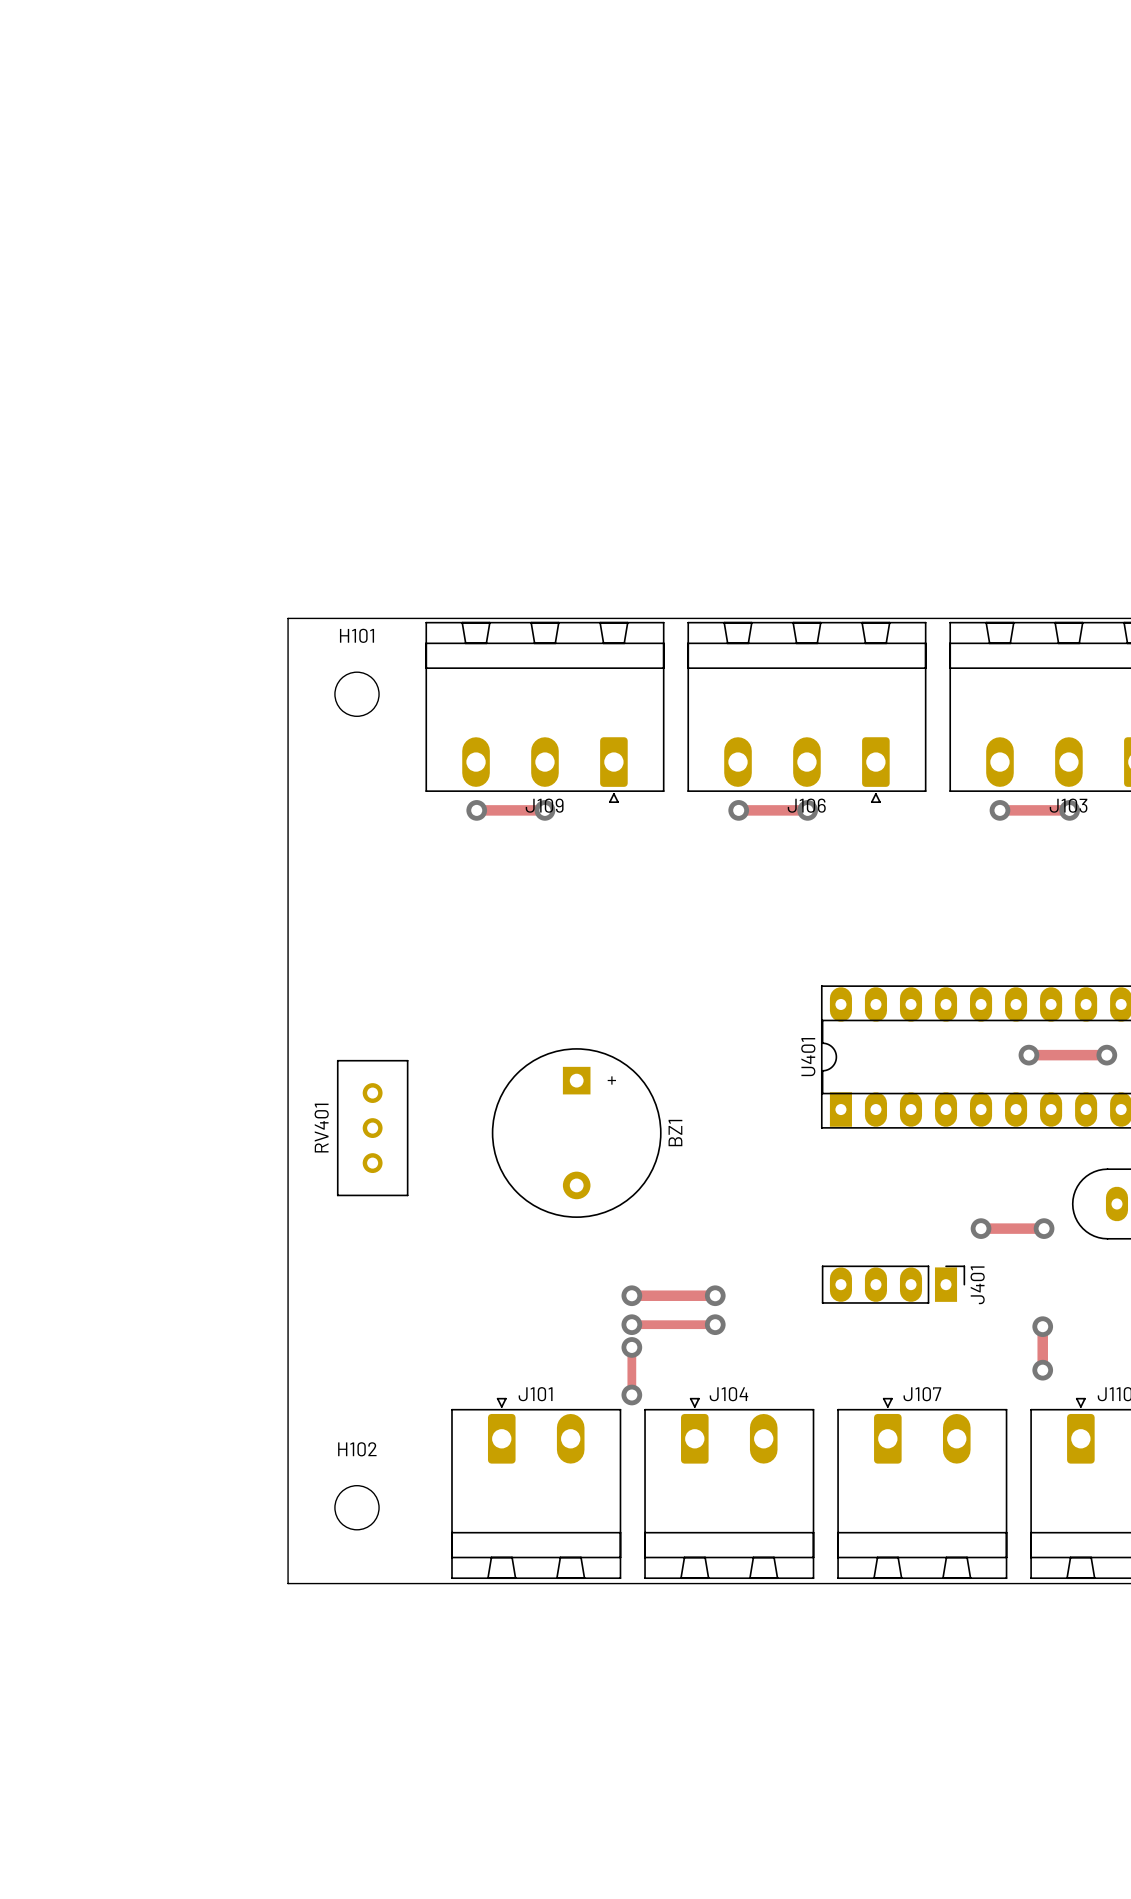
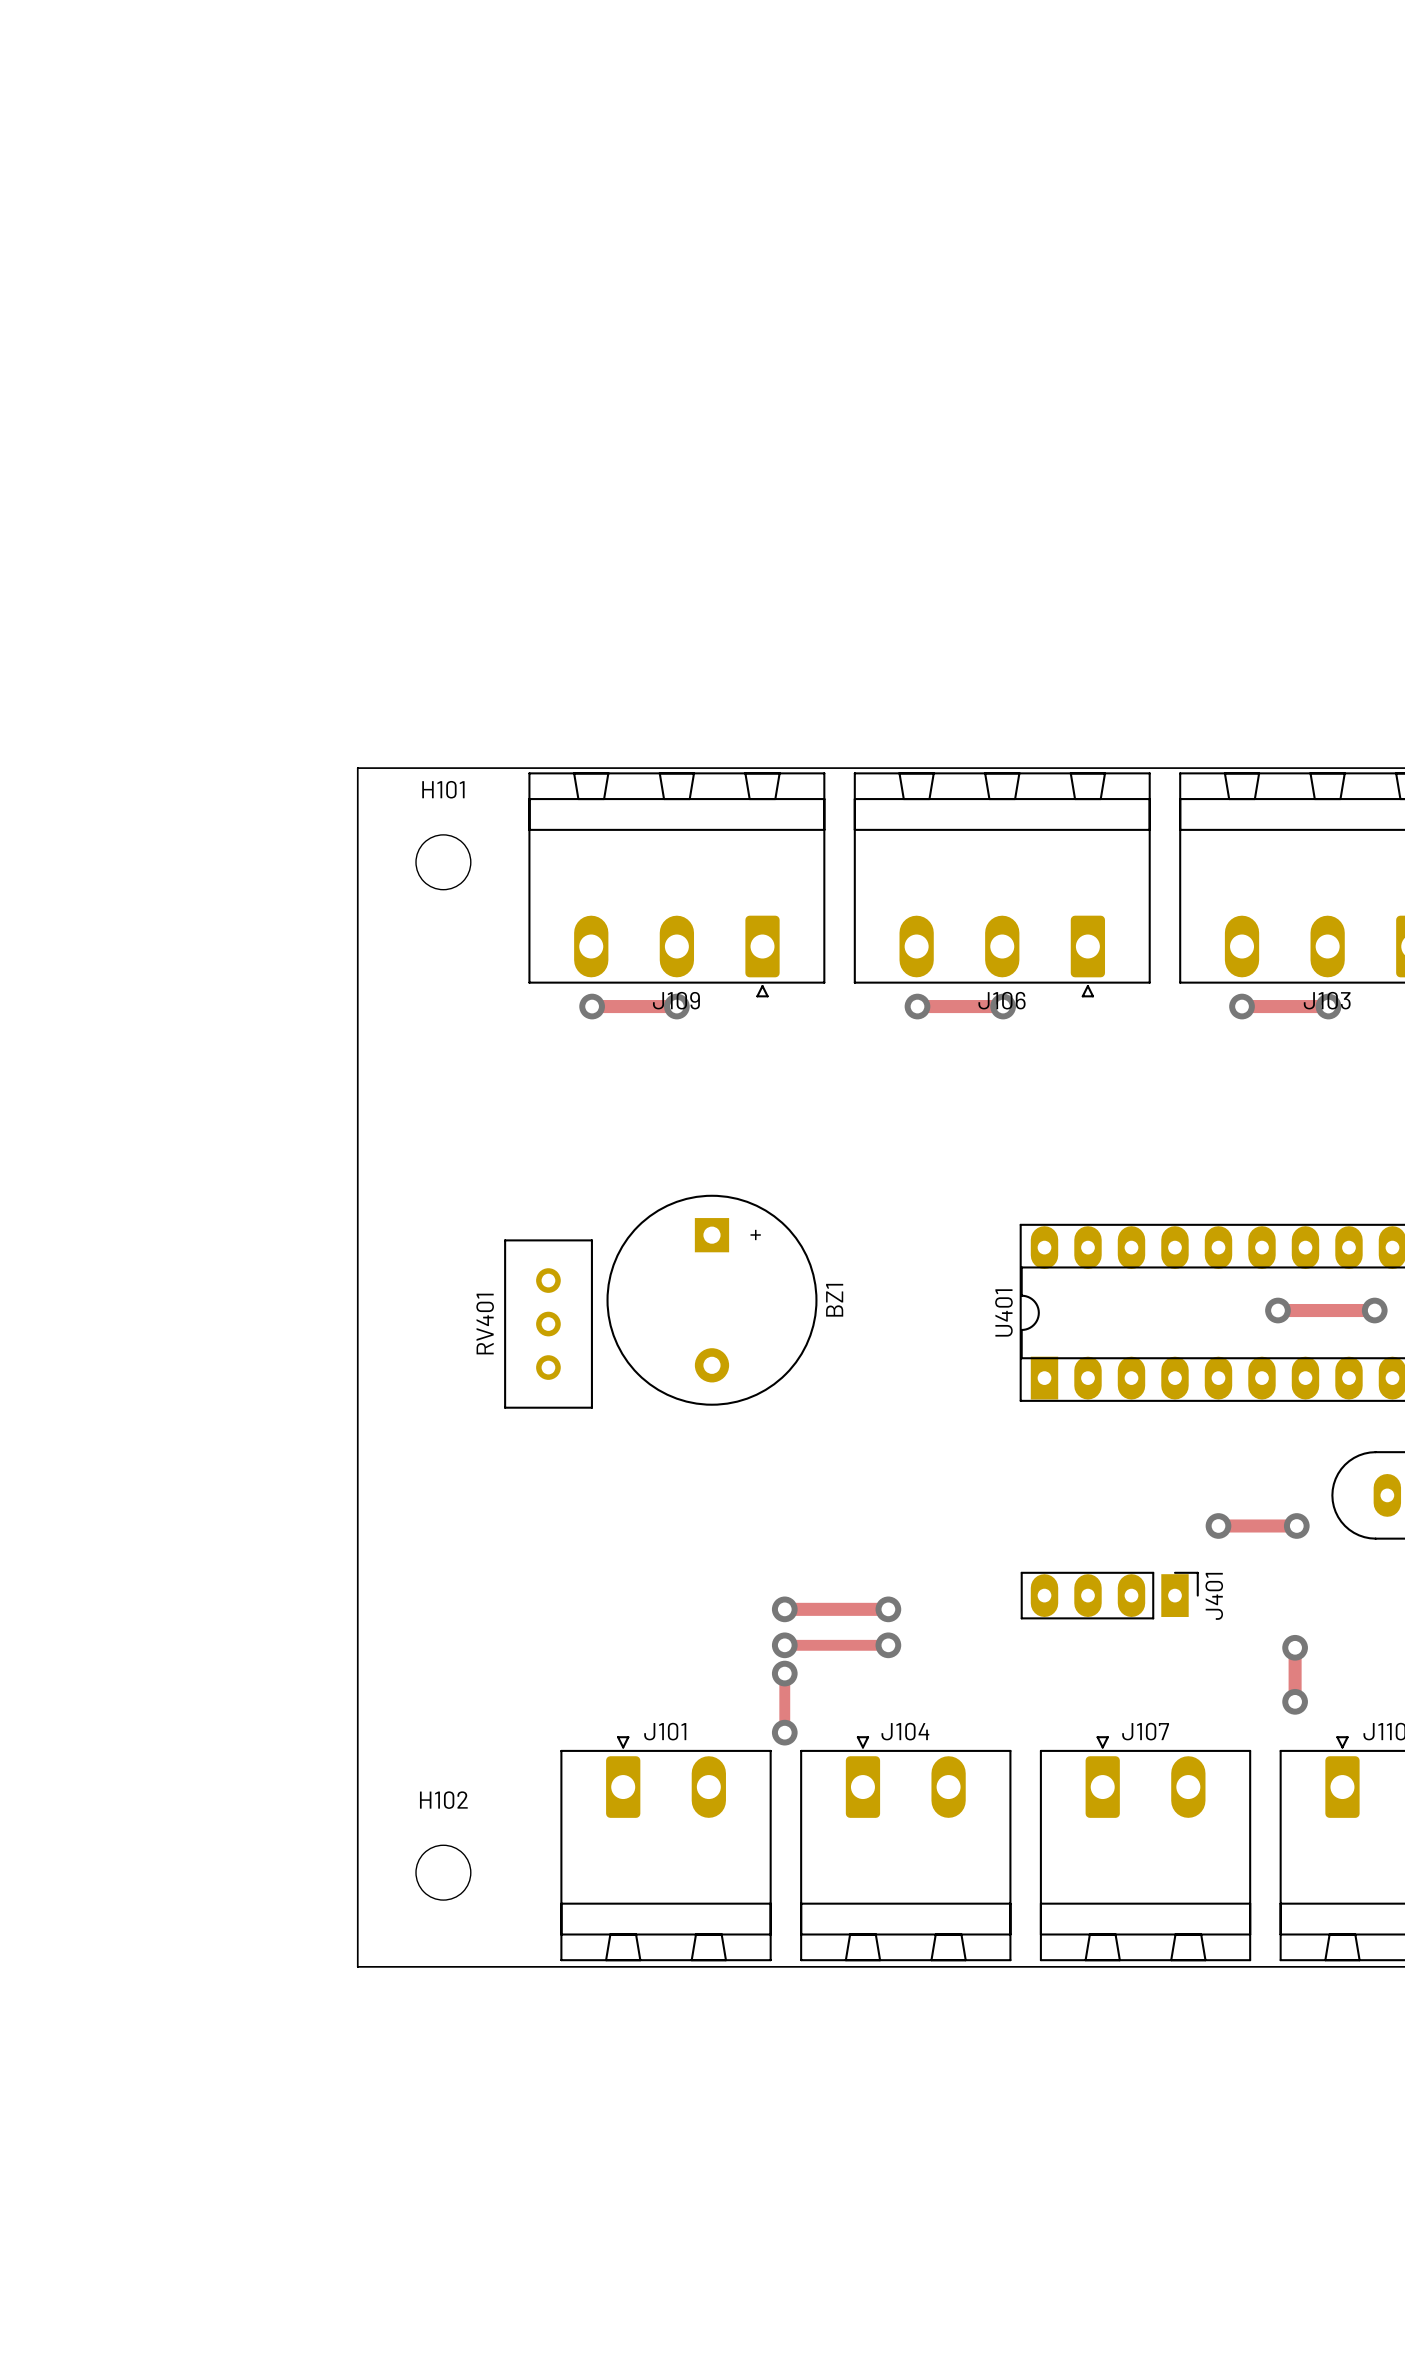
RV401 position: (372, 1128) -> (548, 1324)
BZ1 position: (576, 1133) -> (711, 1300)

